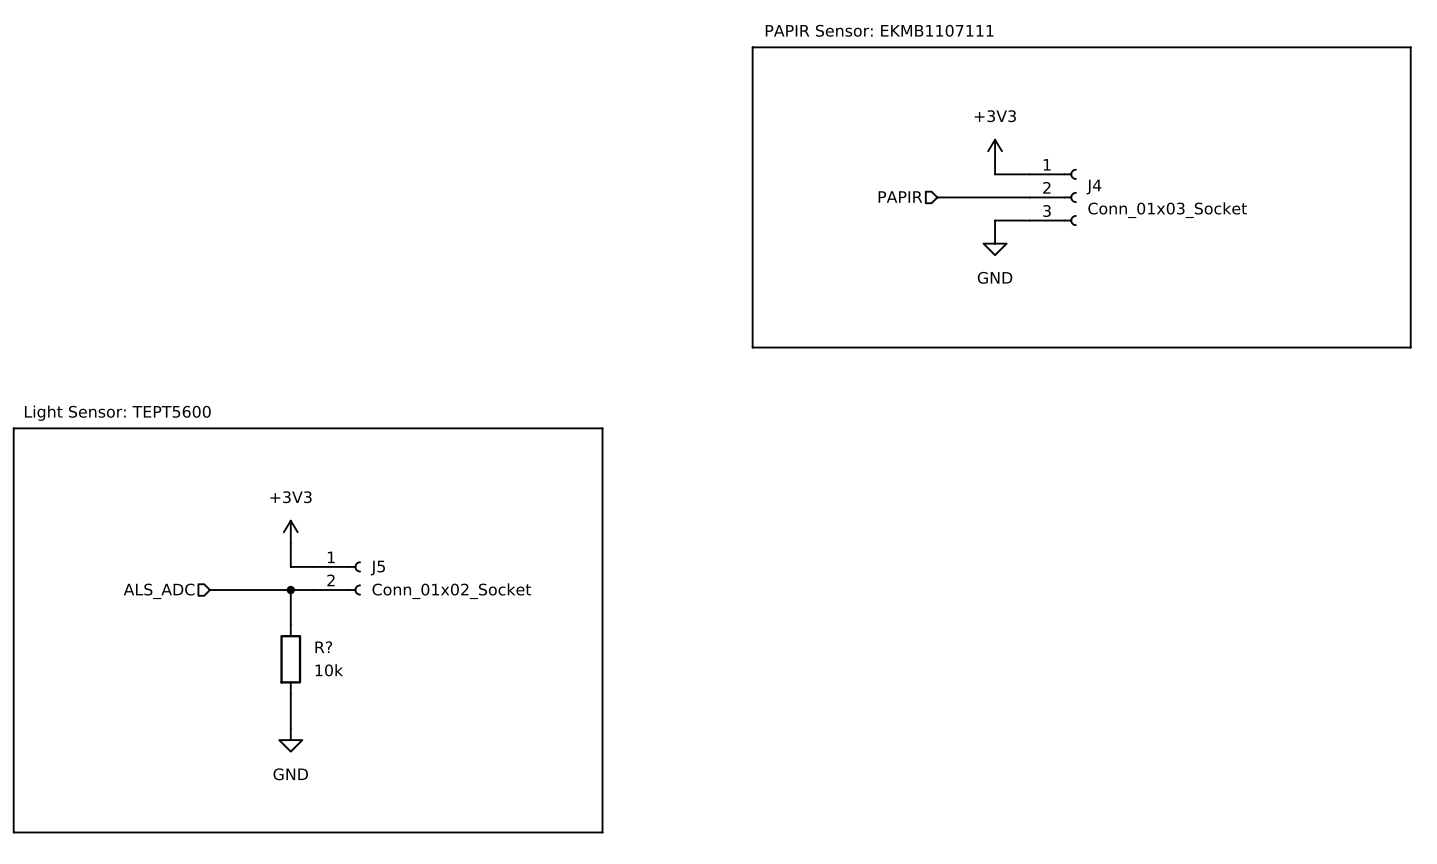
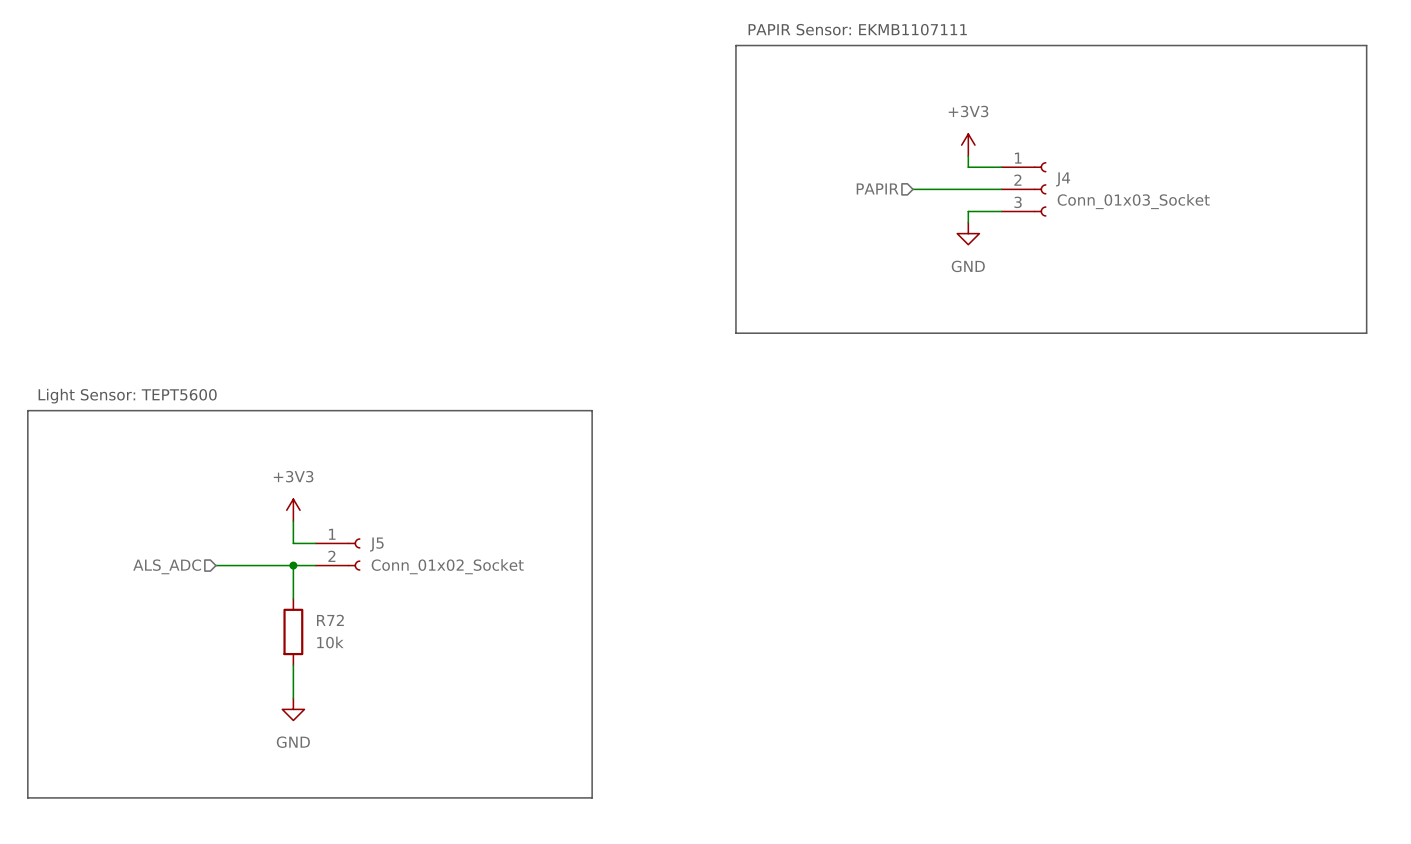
R? name: R? (323, 647) -> R72 (330, 620)

